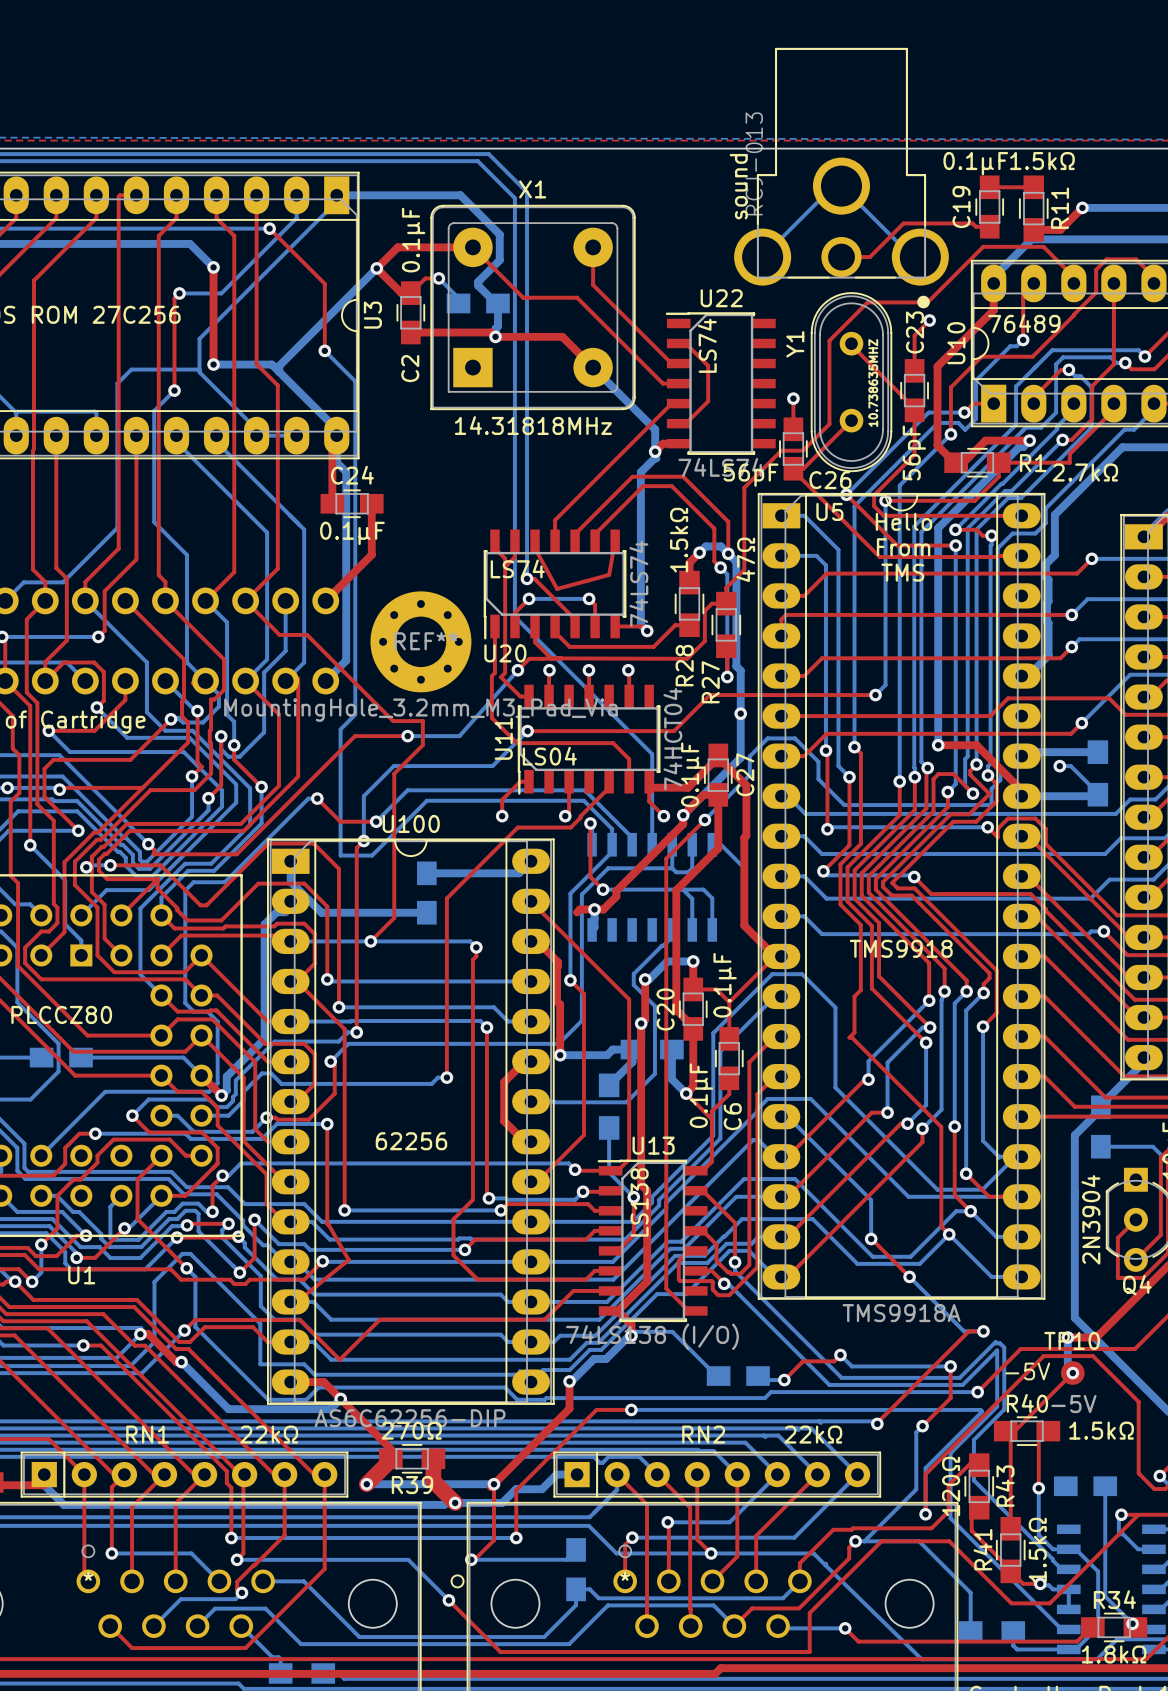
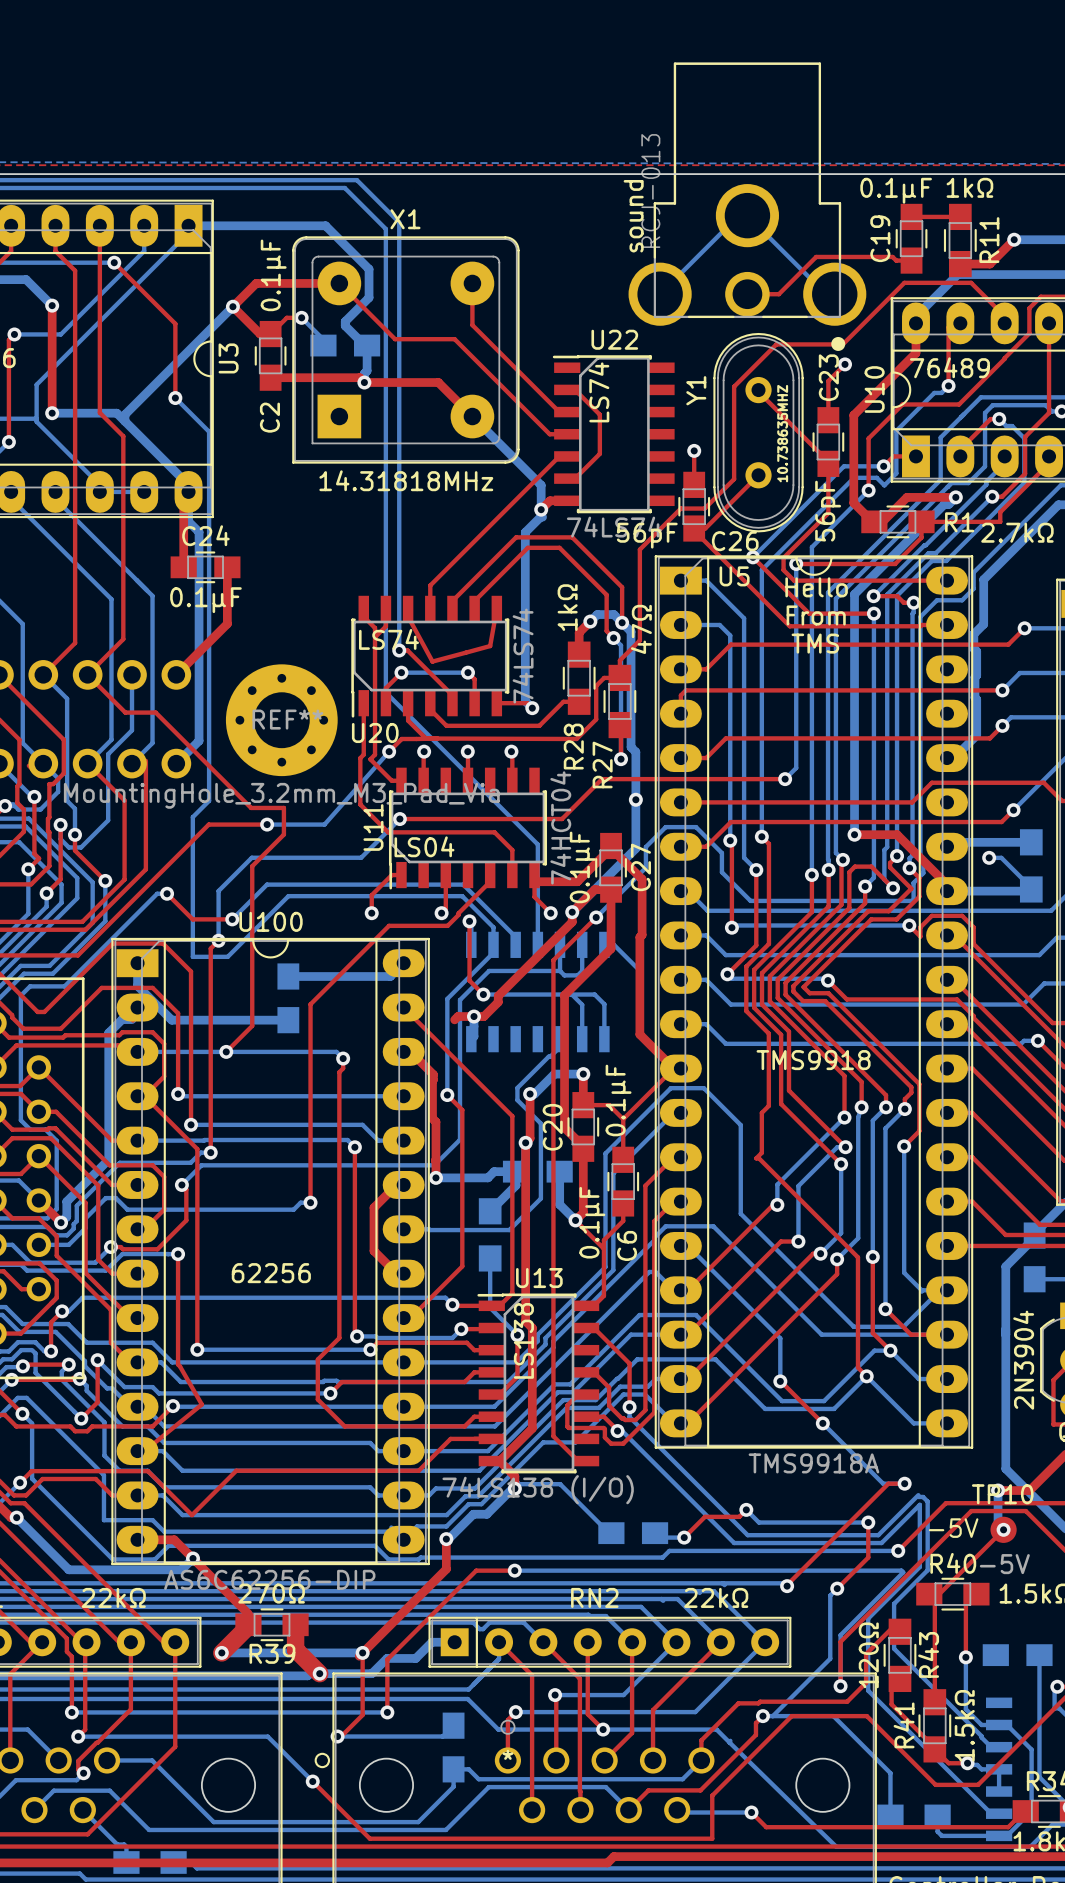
R11 value: 1.5kΩ (1042, 161) -> 1kΩ (969, 187)
R28 value: 1.5kΩ (679, 540) -> 1kΩ (567, 607)

